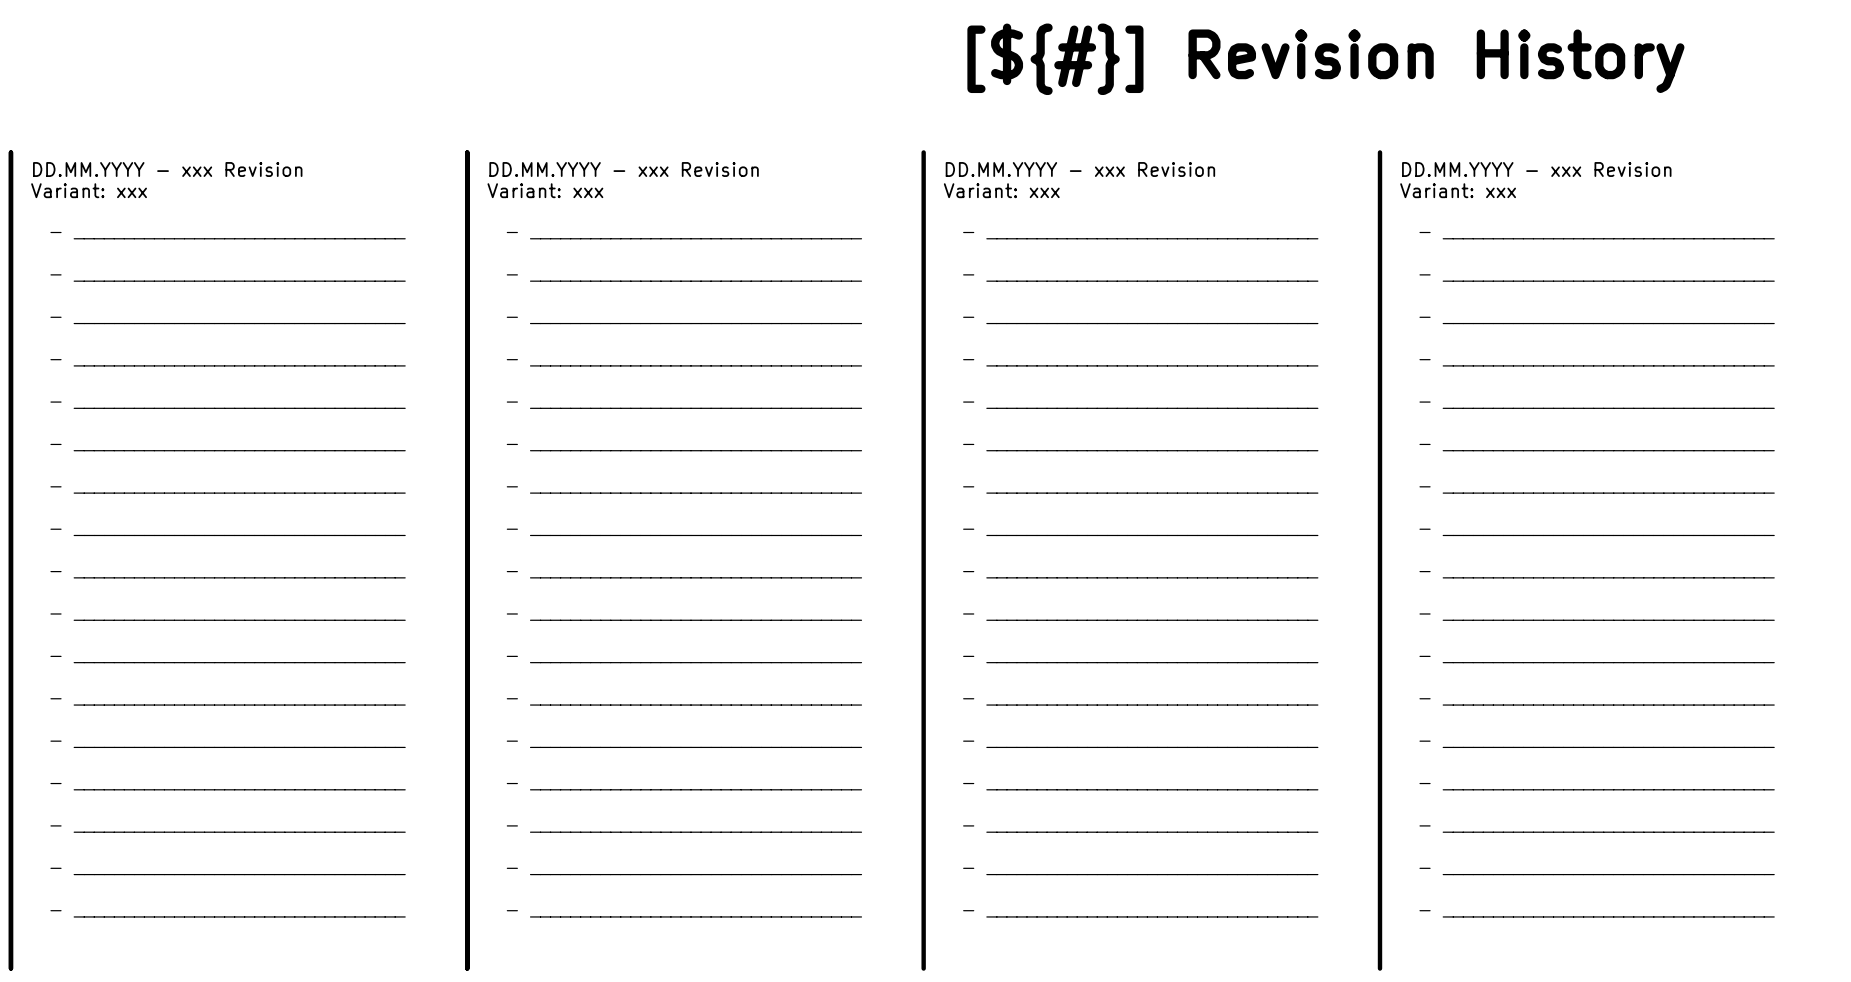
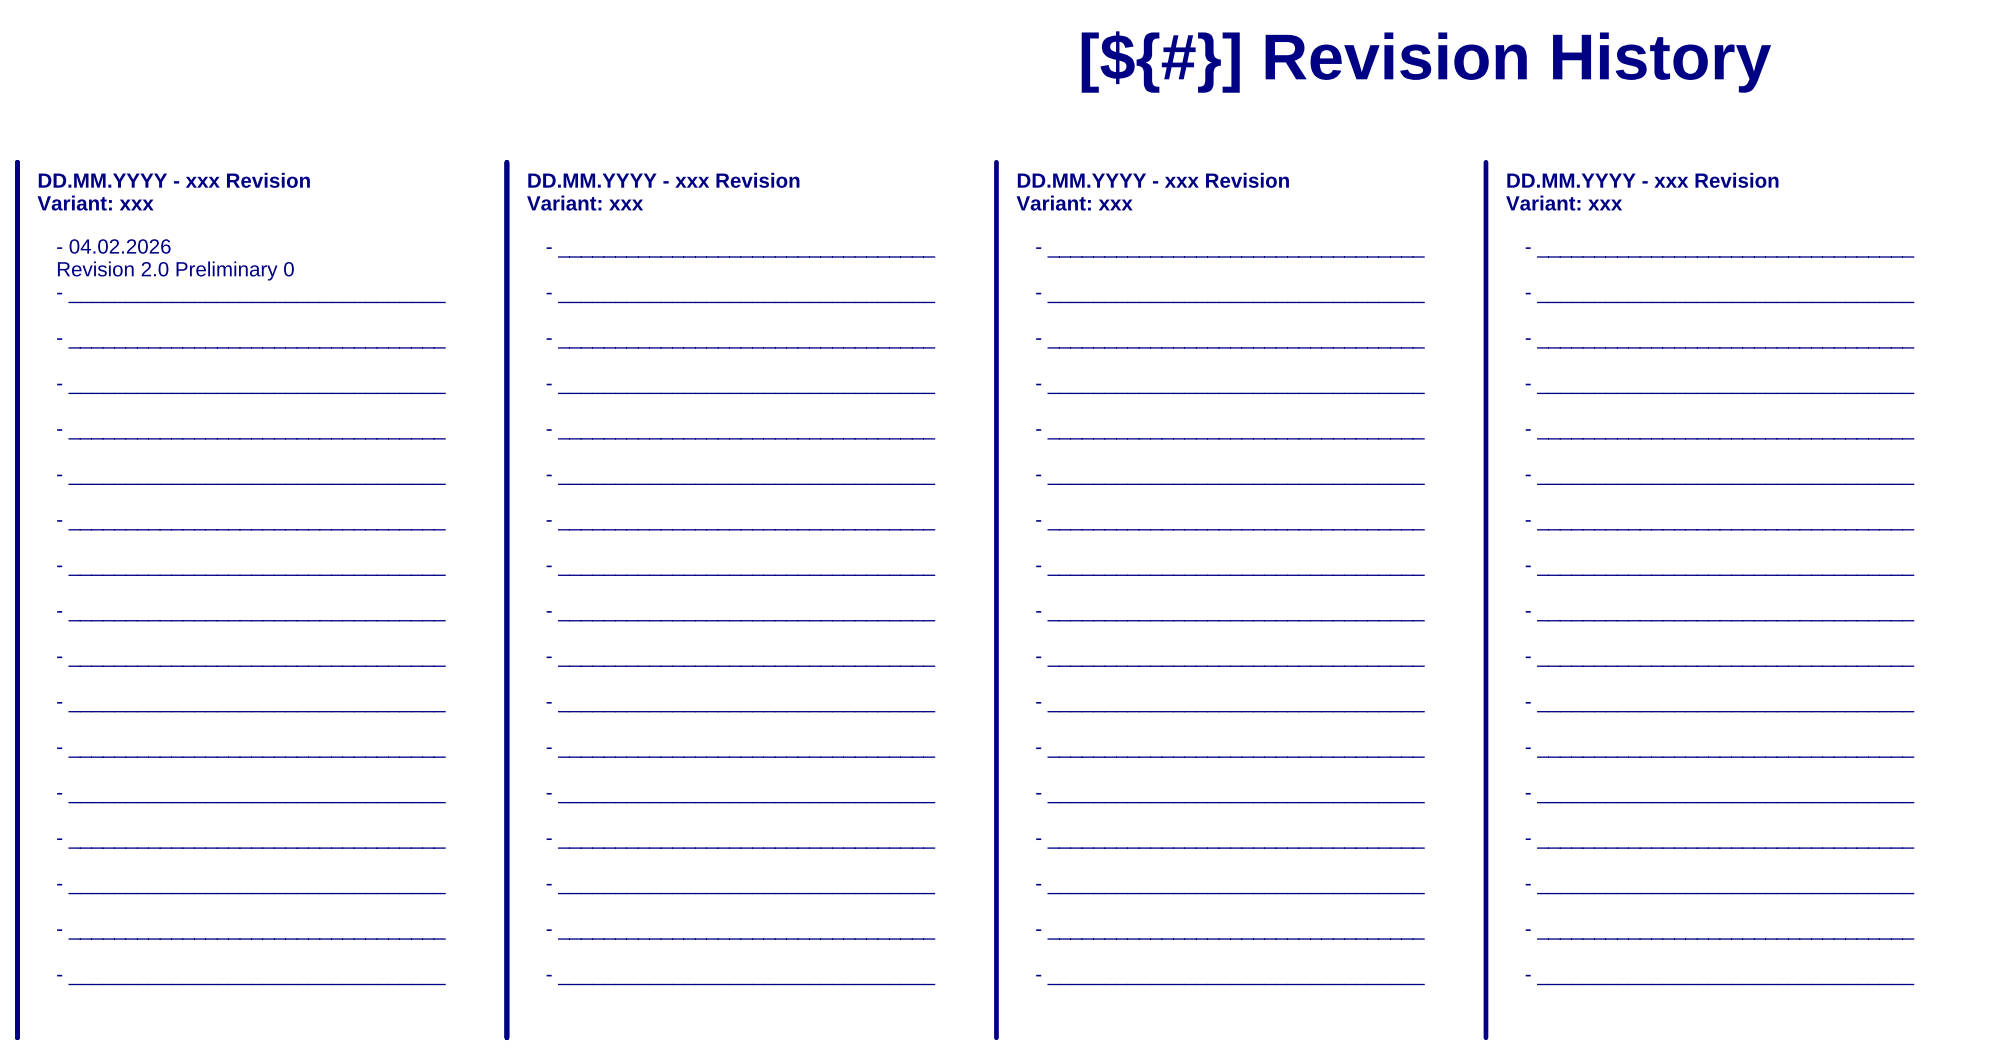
text: - _________________________________ (228, 235) -> - 04.02.2026 (113, 246)
text: none -> Revision 2.0 Preliminary 0 (175, 271)

